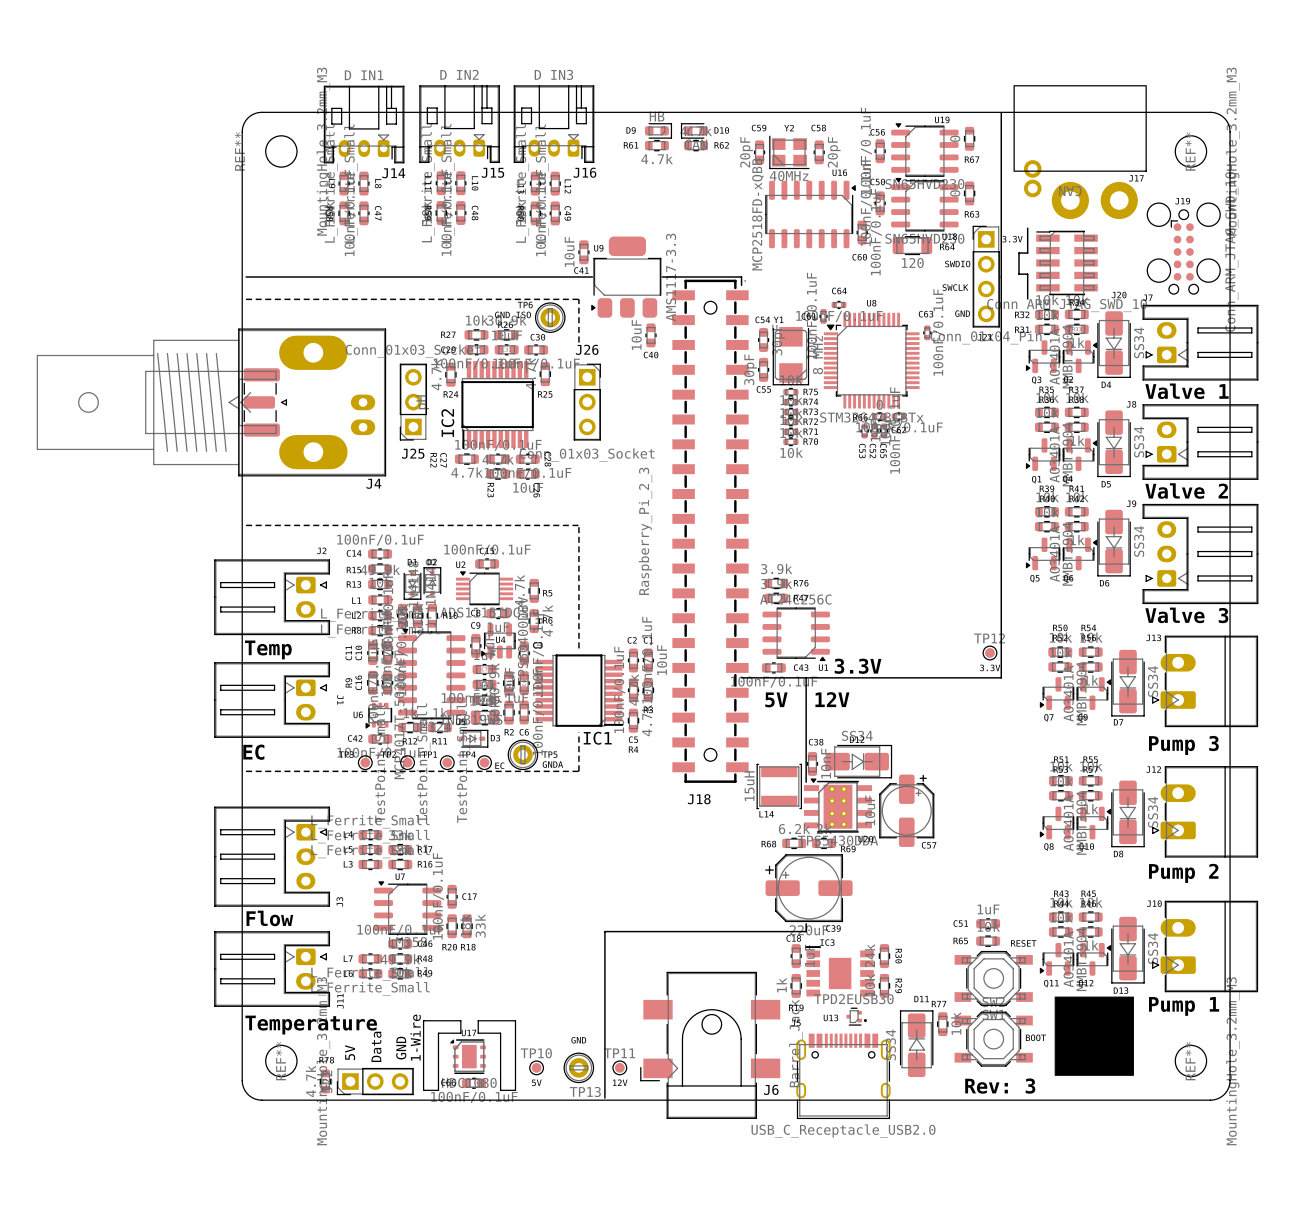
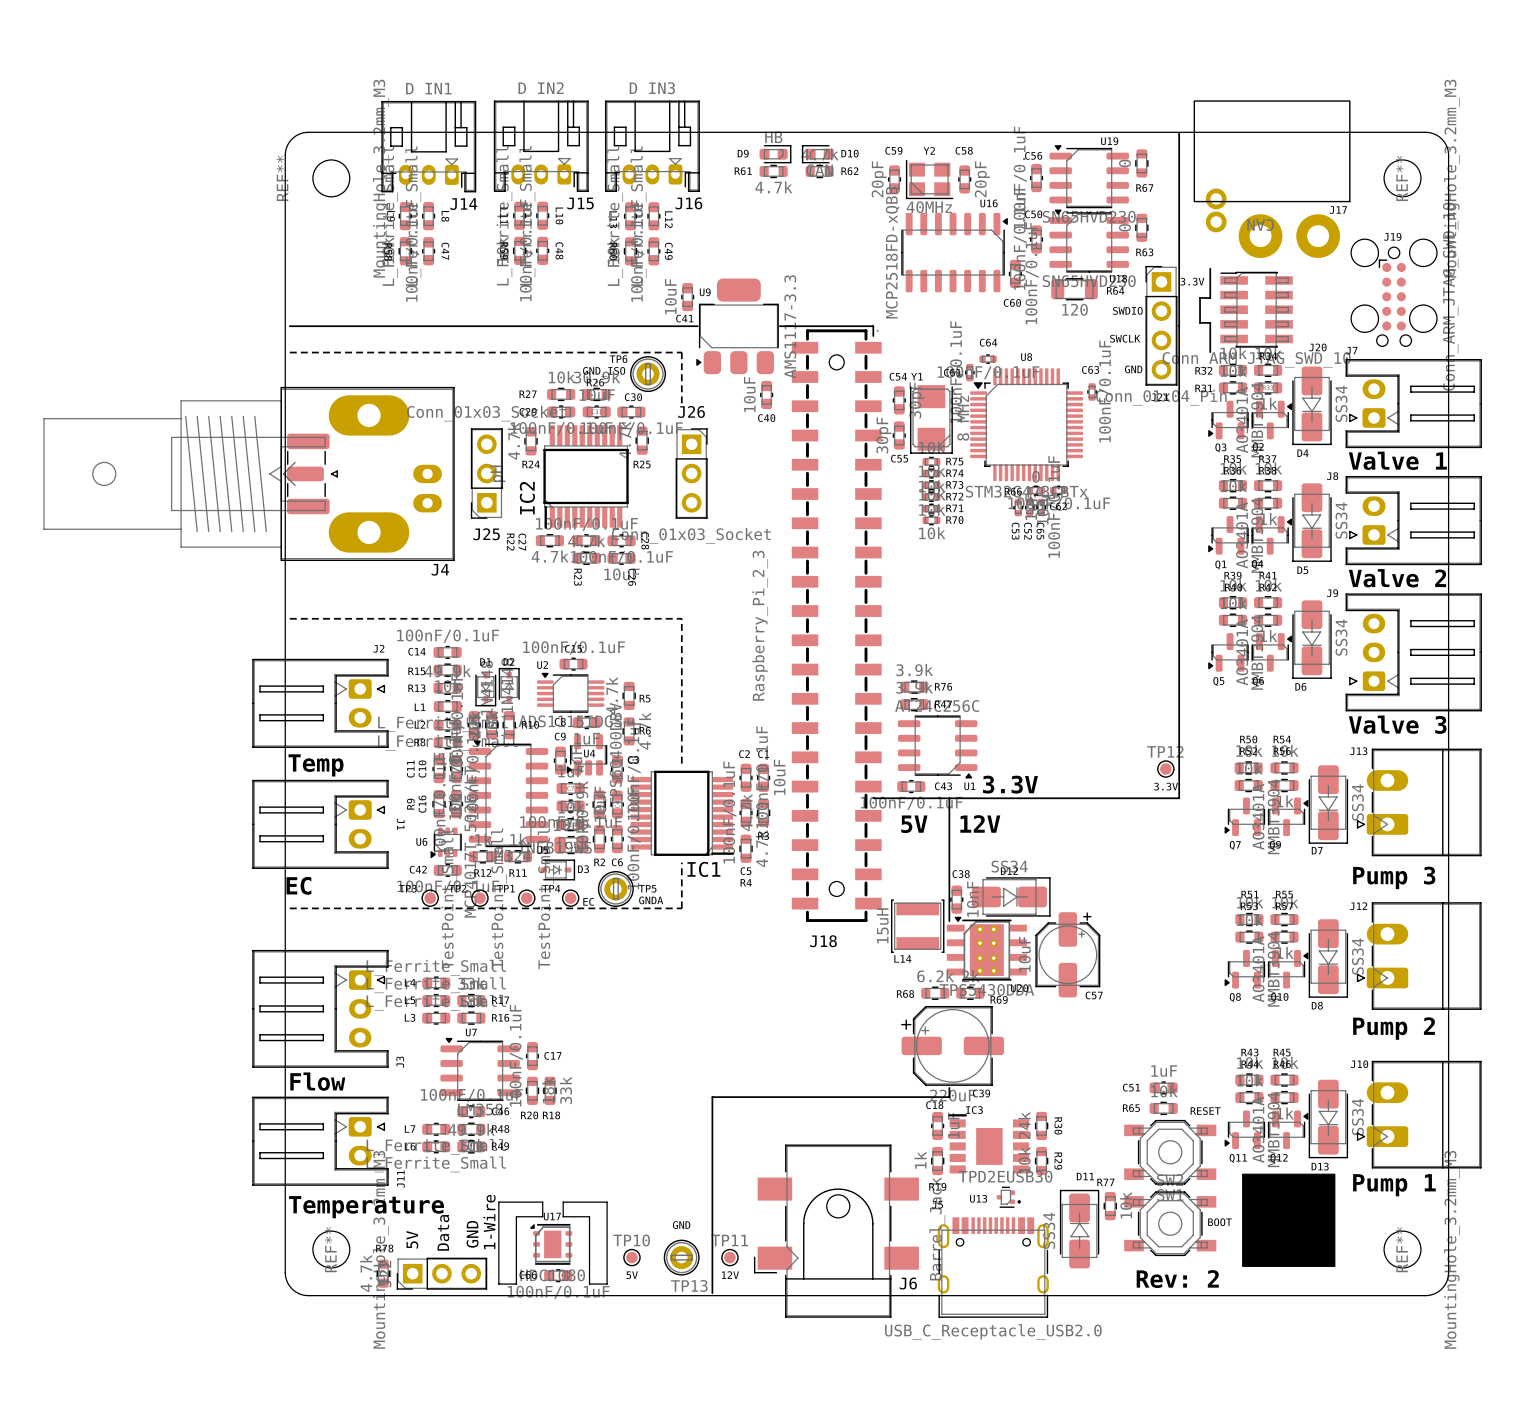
text: Rev: 3 (1000, 1086) -> Rev: 2 (1177, 1279)

